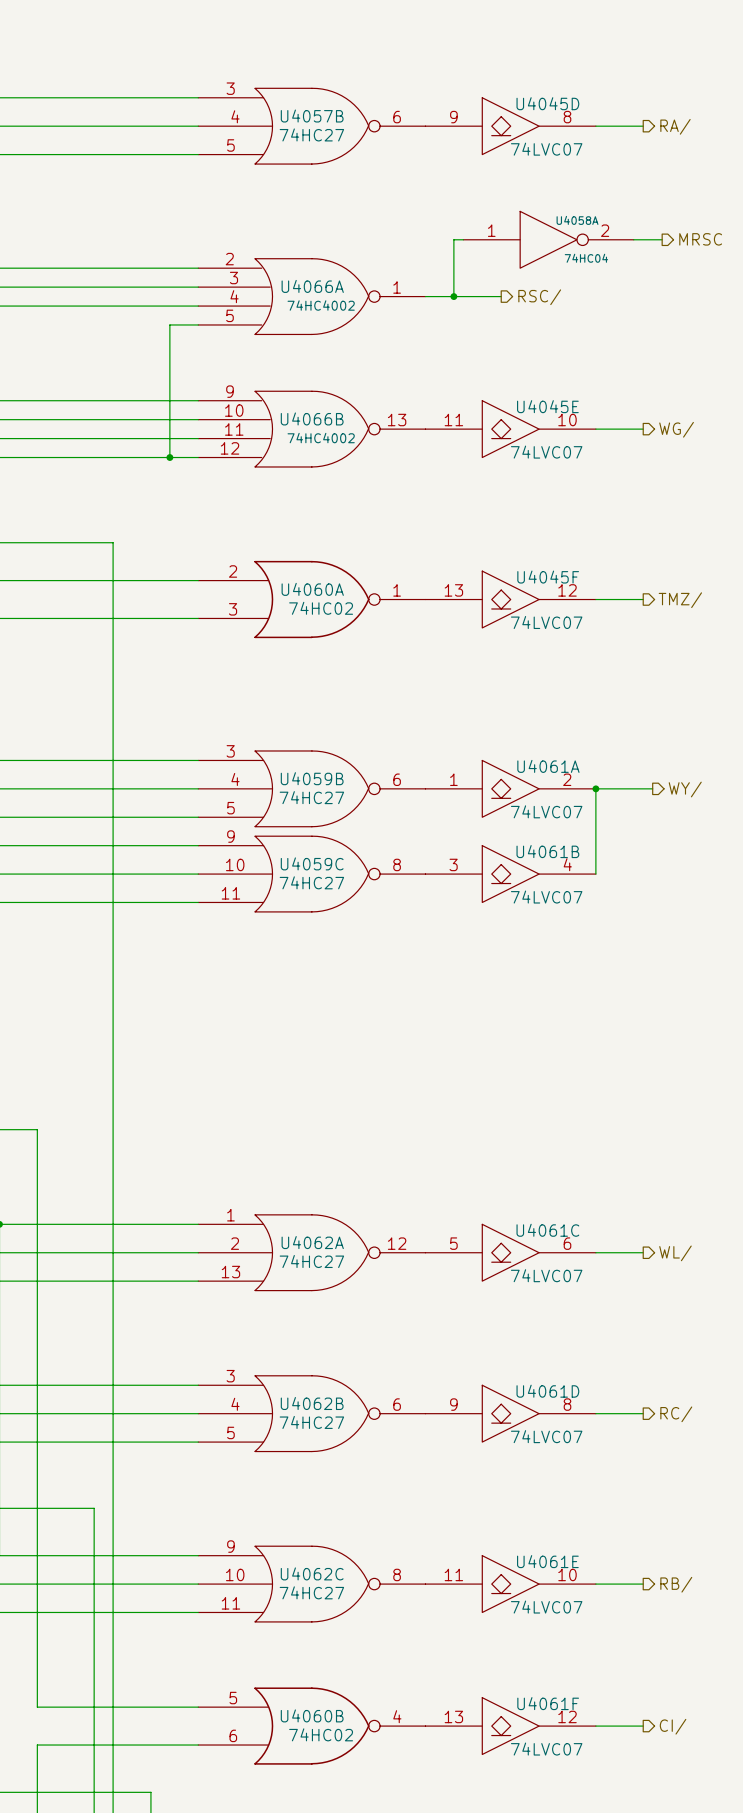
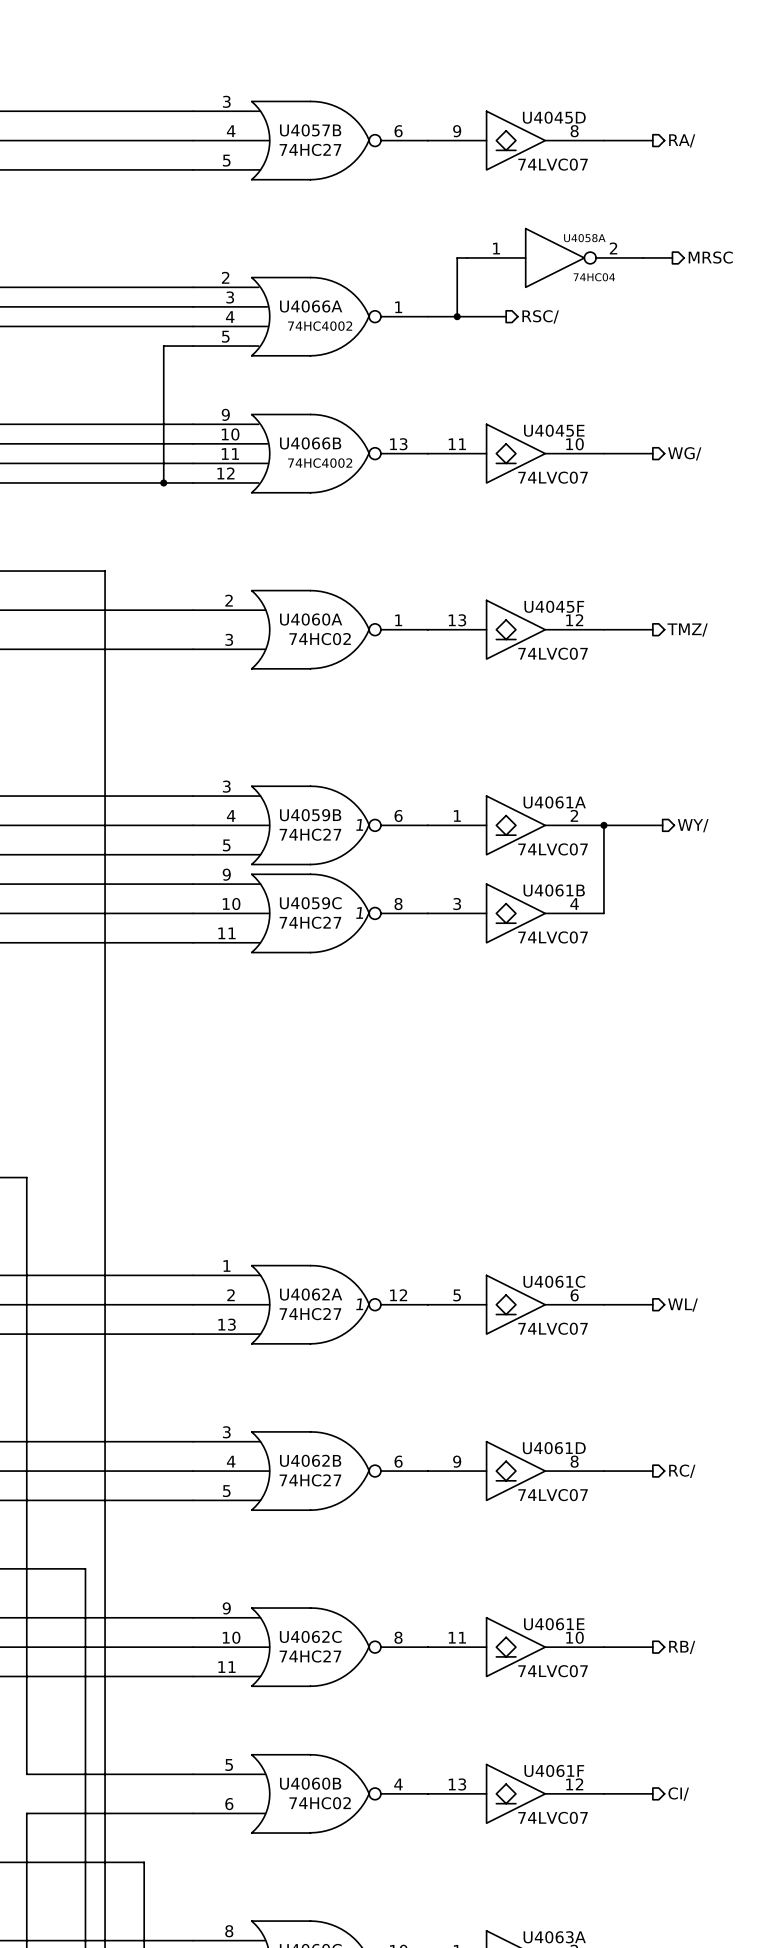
U4059B text: none -> 1 (359, 824)
U4059C text: none -> 1 (359, 912)
U4062A text: none -> 1 (359, 1304)

